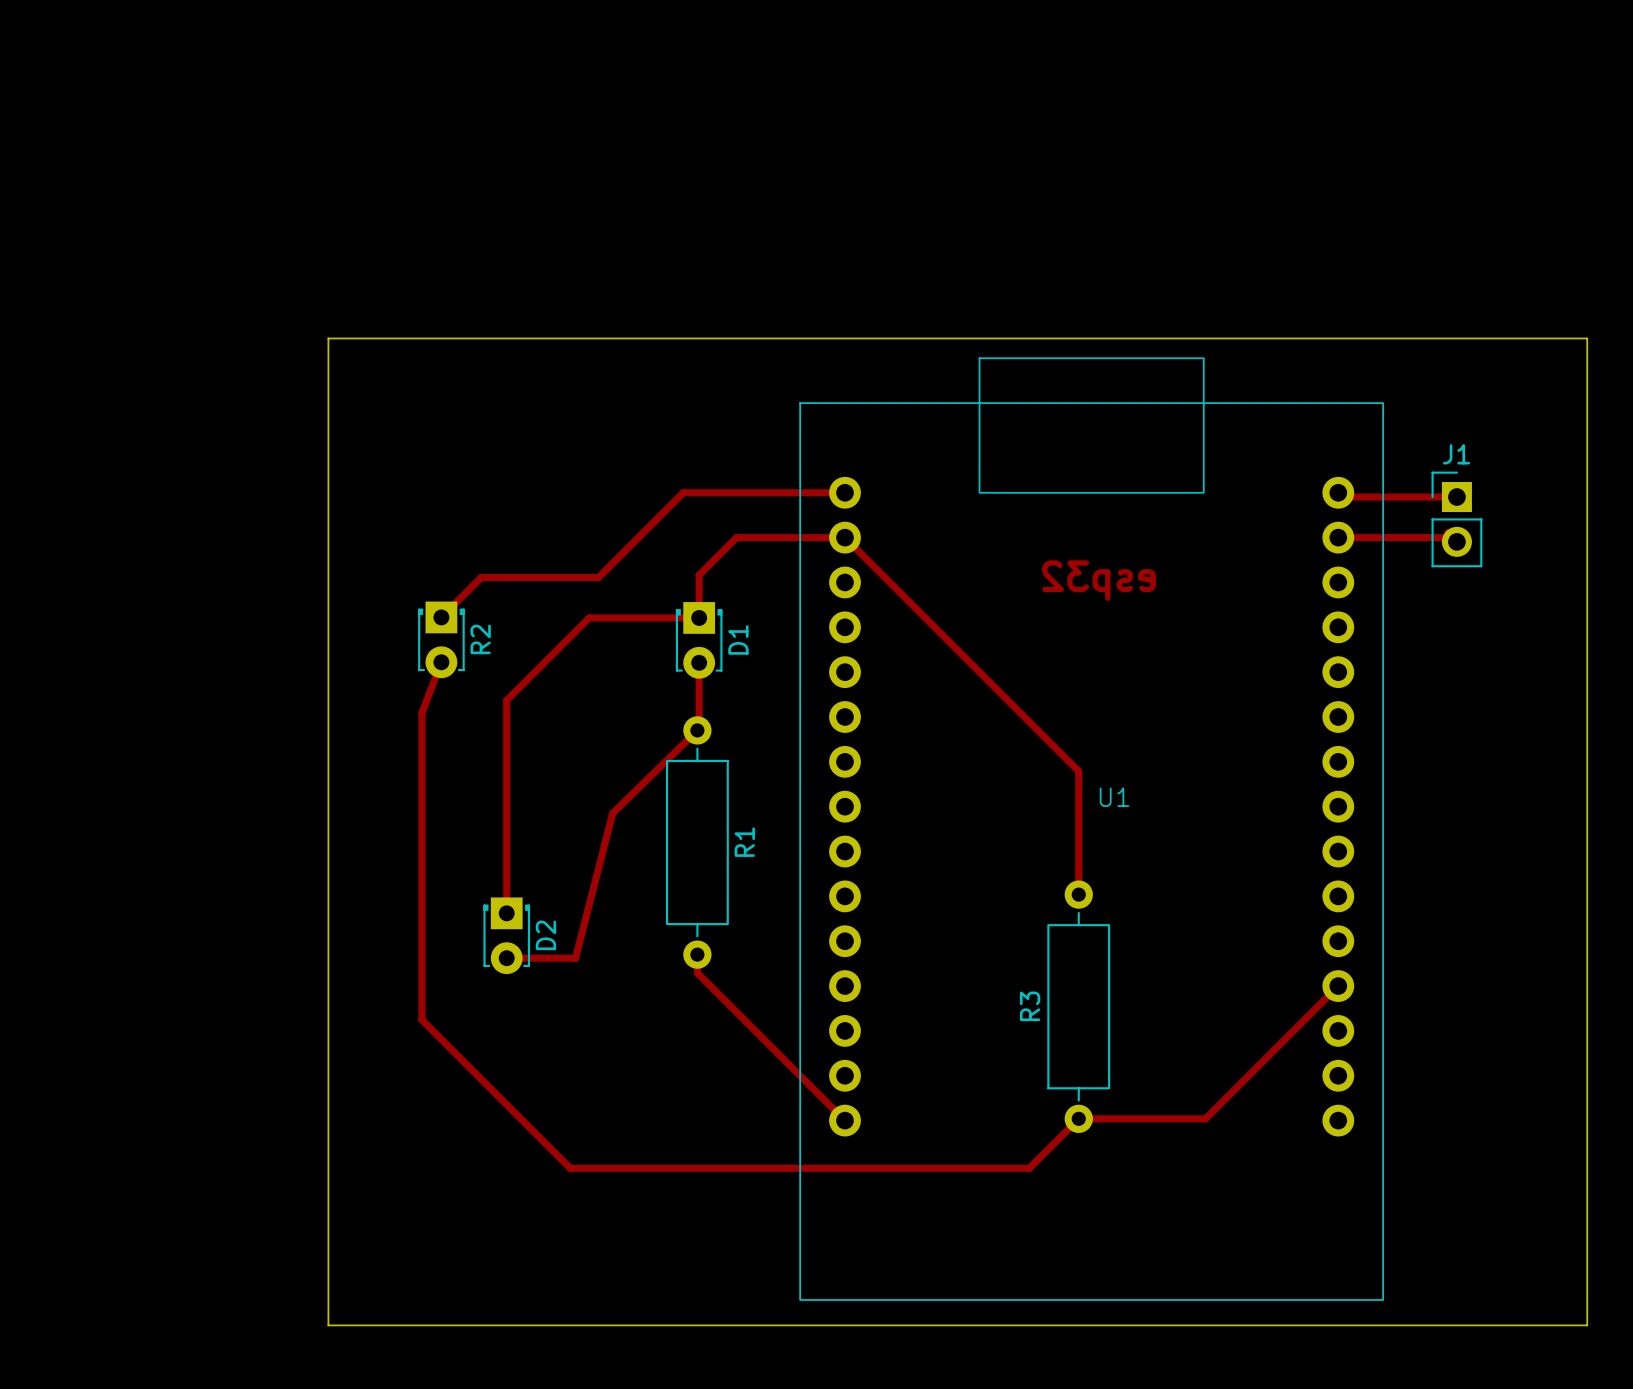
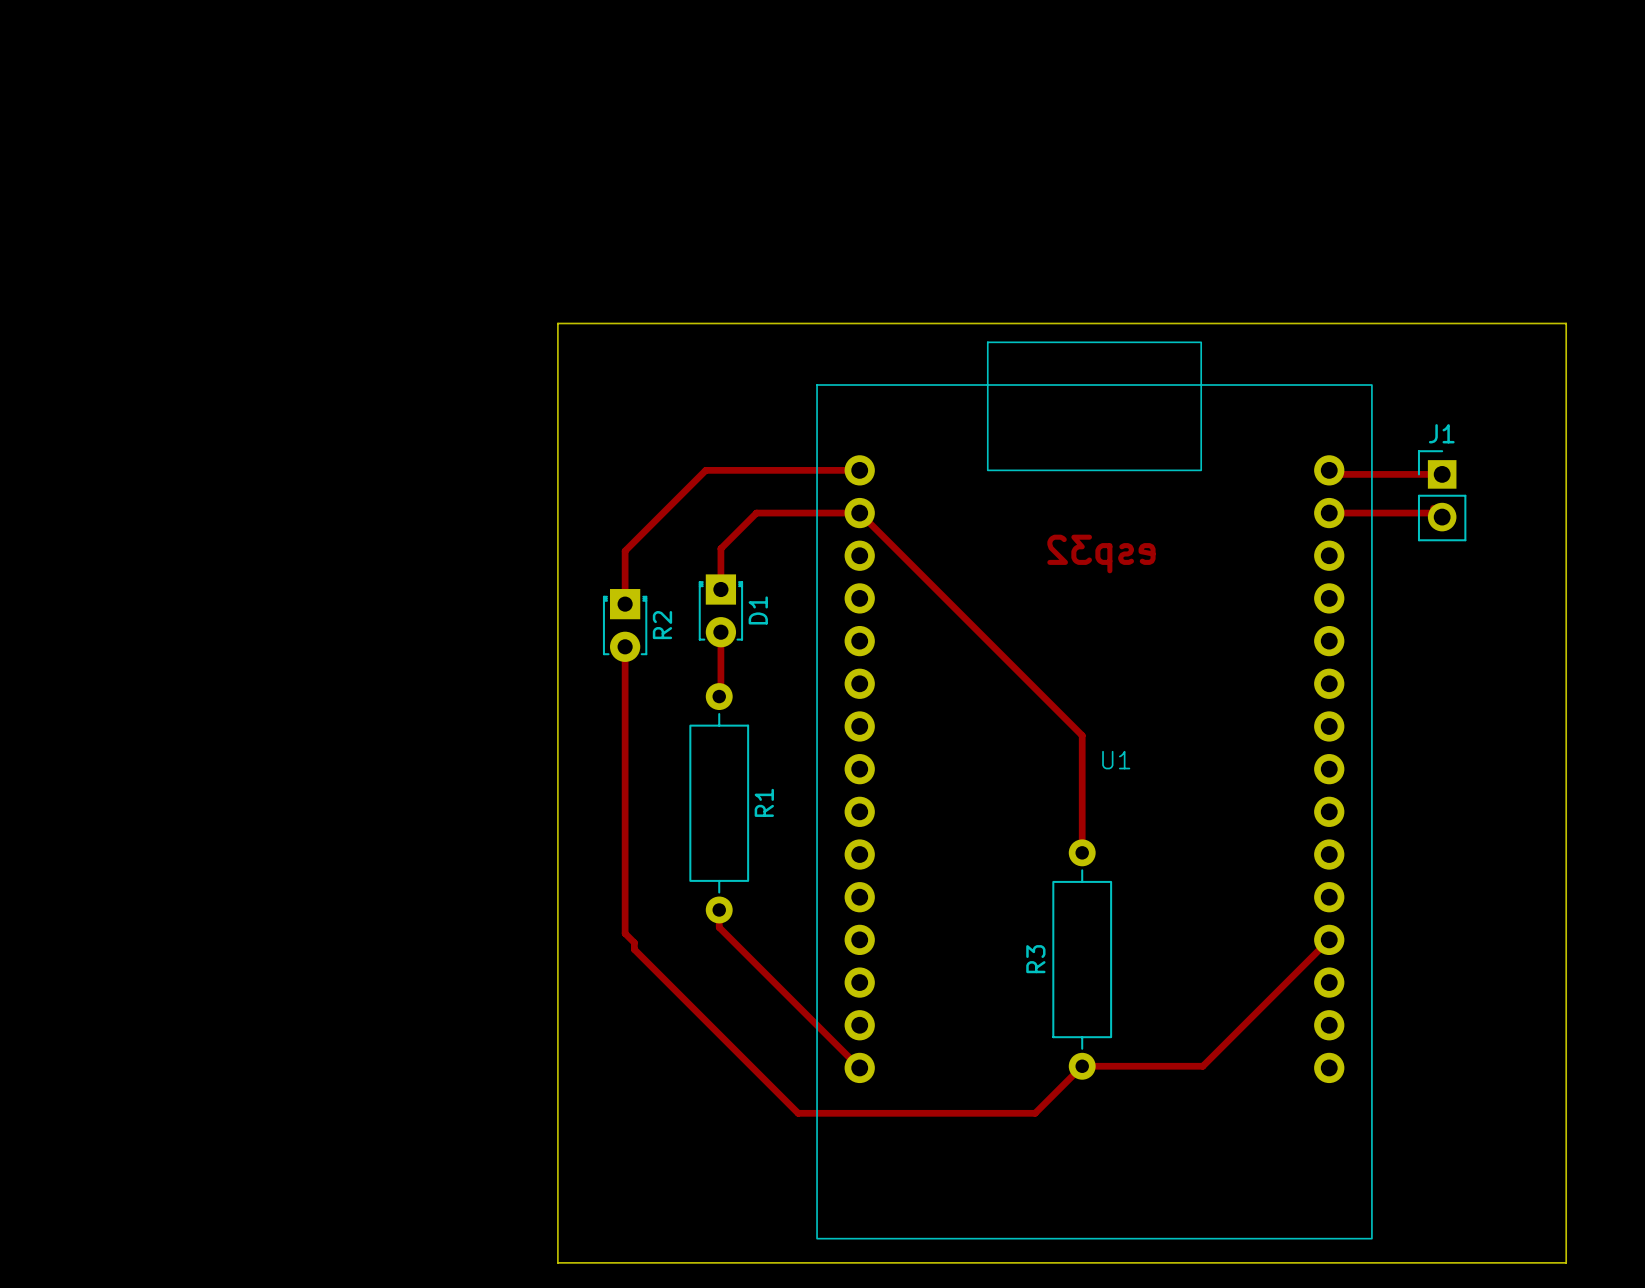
board edge: (527, 338) (328, 338) (328, 1325) (527, 1325) -> (557, 323) (557, 1262)
track: (598, 577) (481, 577) (441, 617) -> (625, 551) (625, 604)
track: (699, 617) (589, 617) (506, 700) (506, 913) -> none
R2 position: (441, 639) -> (625, 625)
track: (441, 662) (421, 712) (421, 1019) (570, 1168) (780, 1168) -> (625, 646) (625, 933) (634, 942) (634, 949) (798, 1113)
track: (697, 730) (612, 813) (575, 958) (506, 958) -> none
D2: (506, 935) -> none

